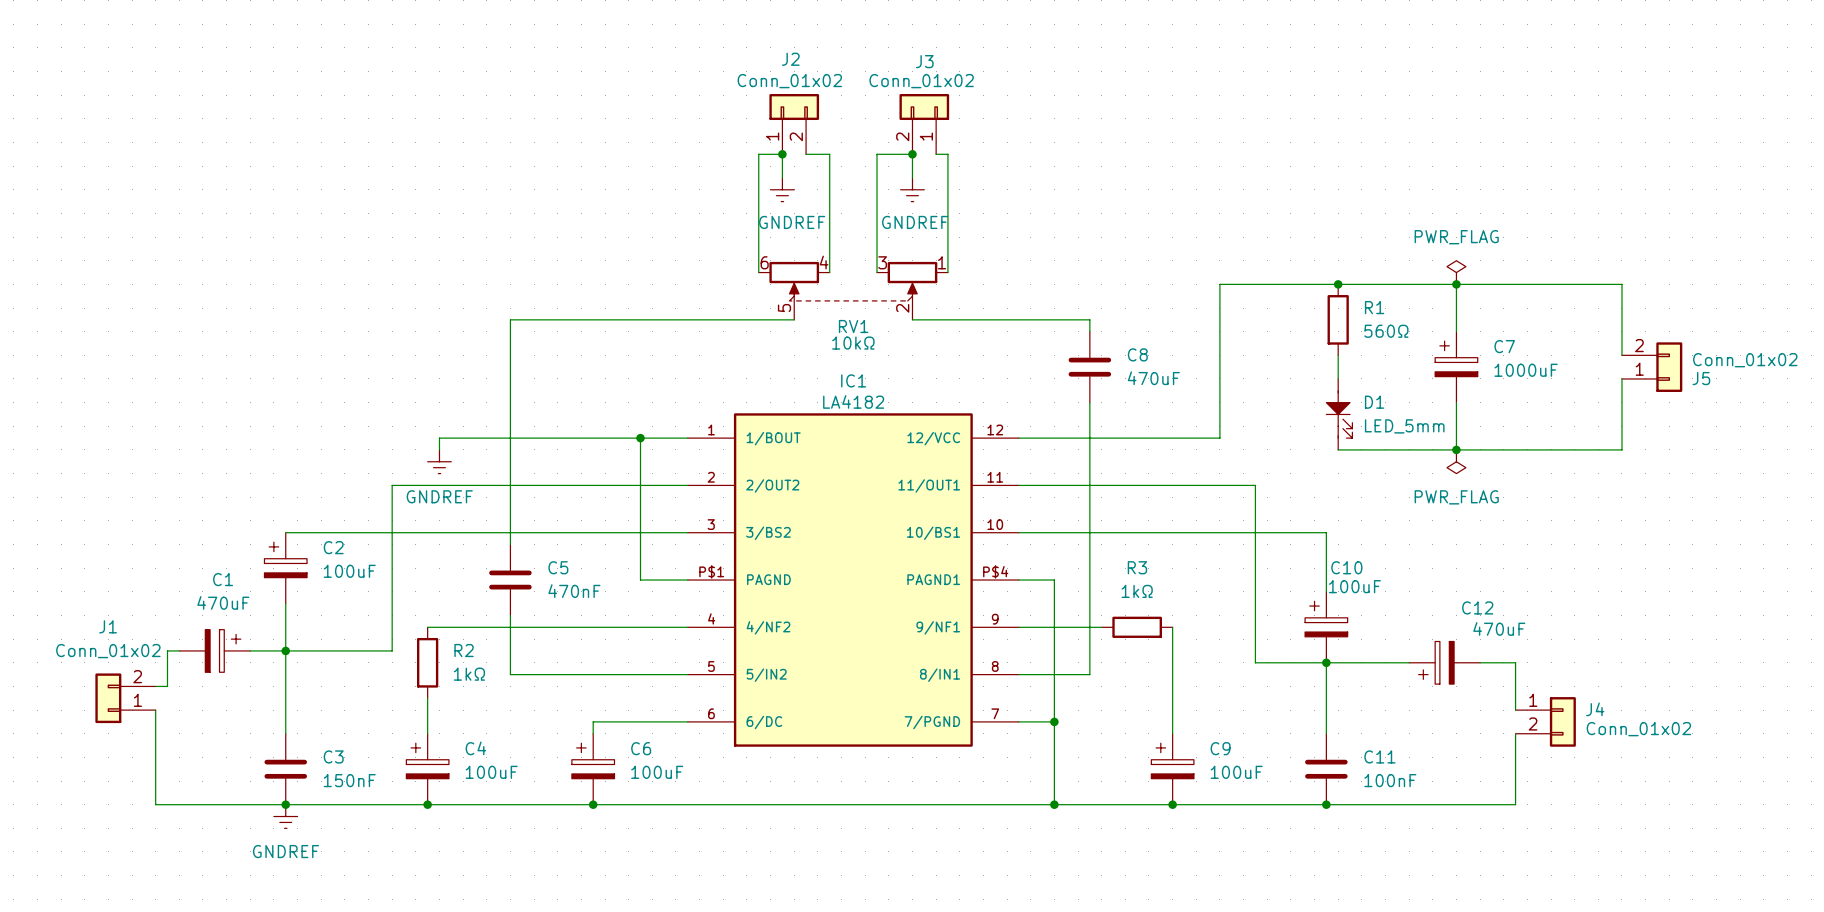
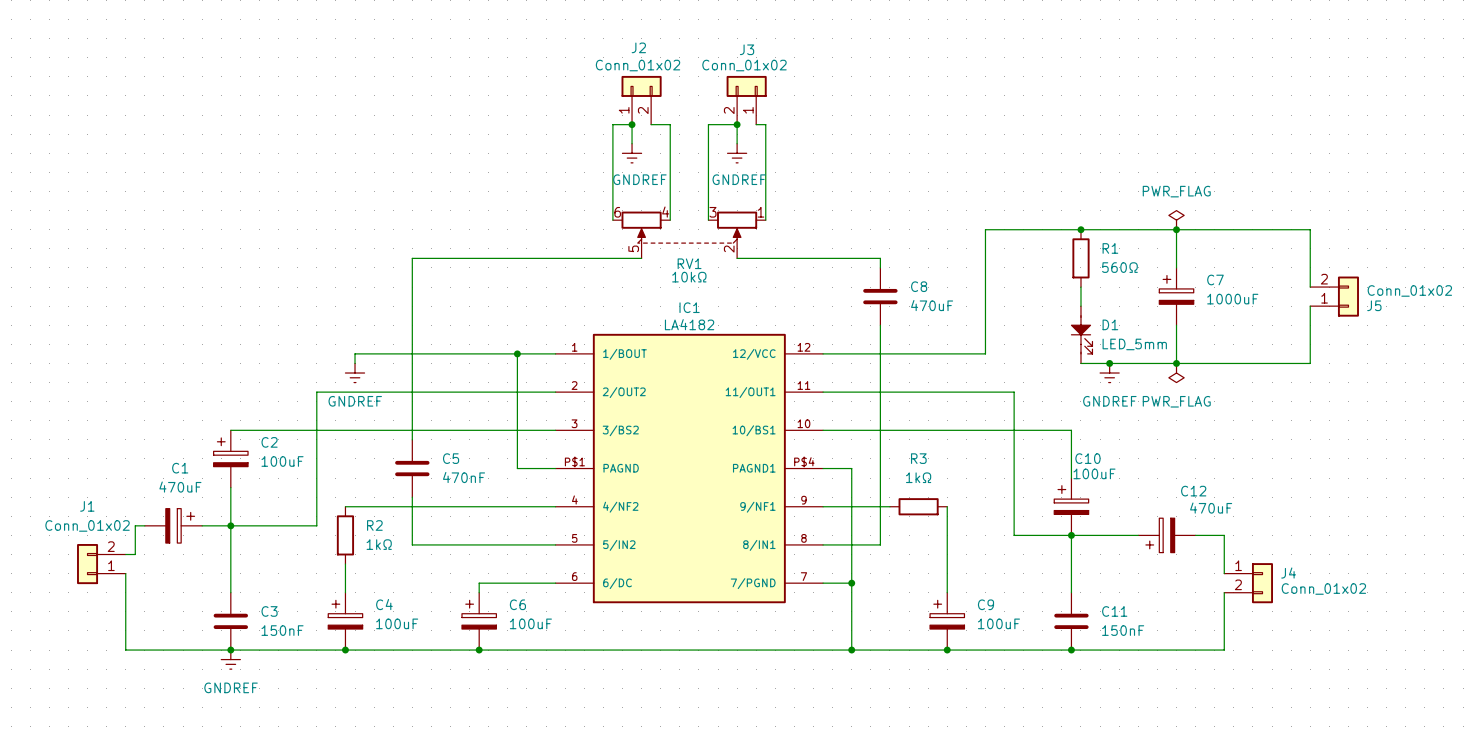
junction: none -> (1109, 363)
power symbol: none -> GNDREF (1109, 373)
C11 value: 100nF (1390, 780) -> 150nF (1123, 630)

